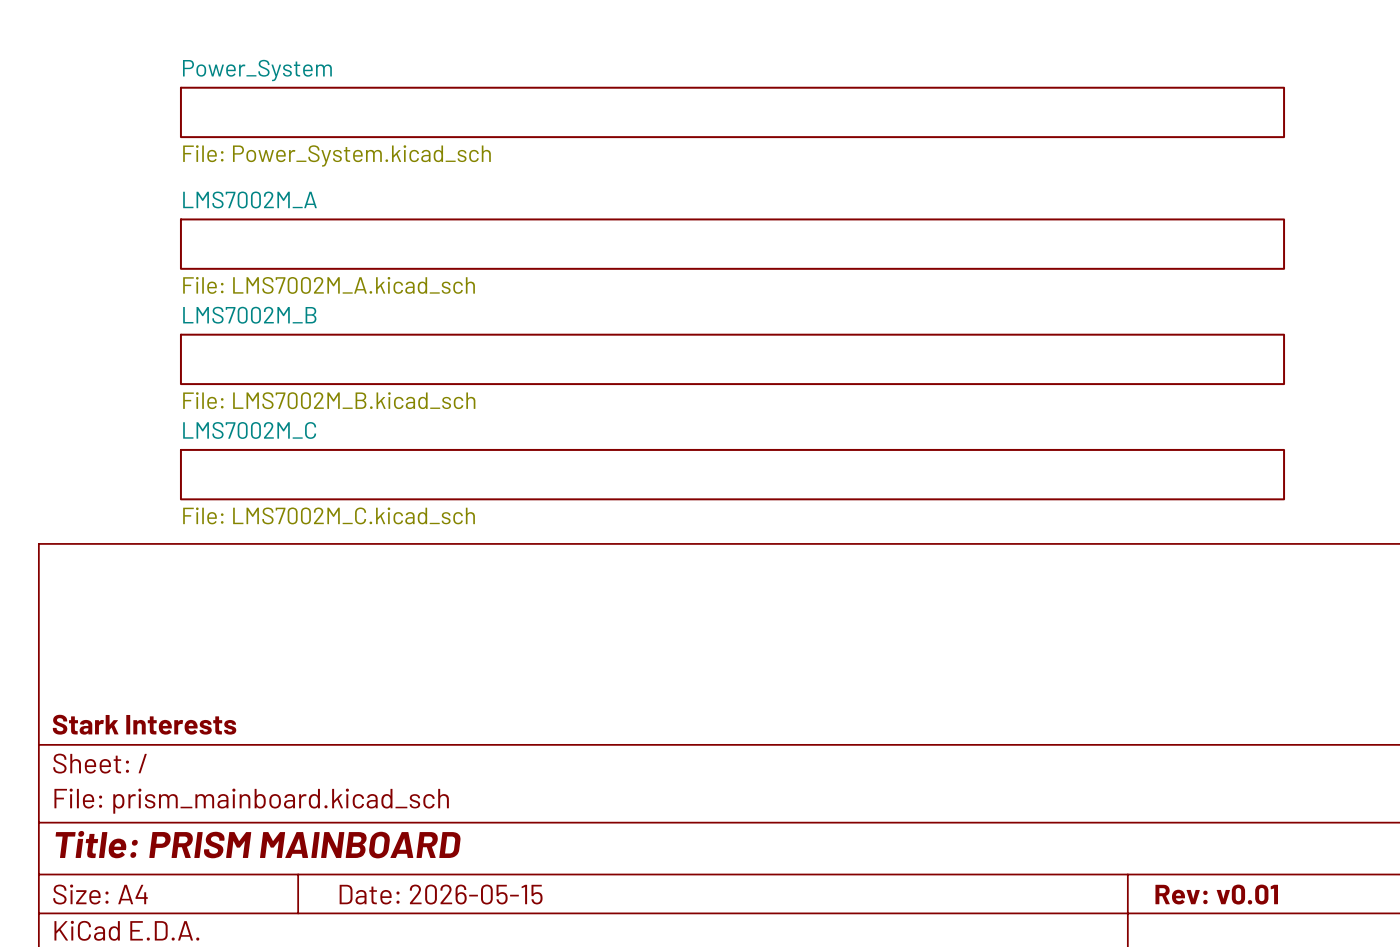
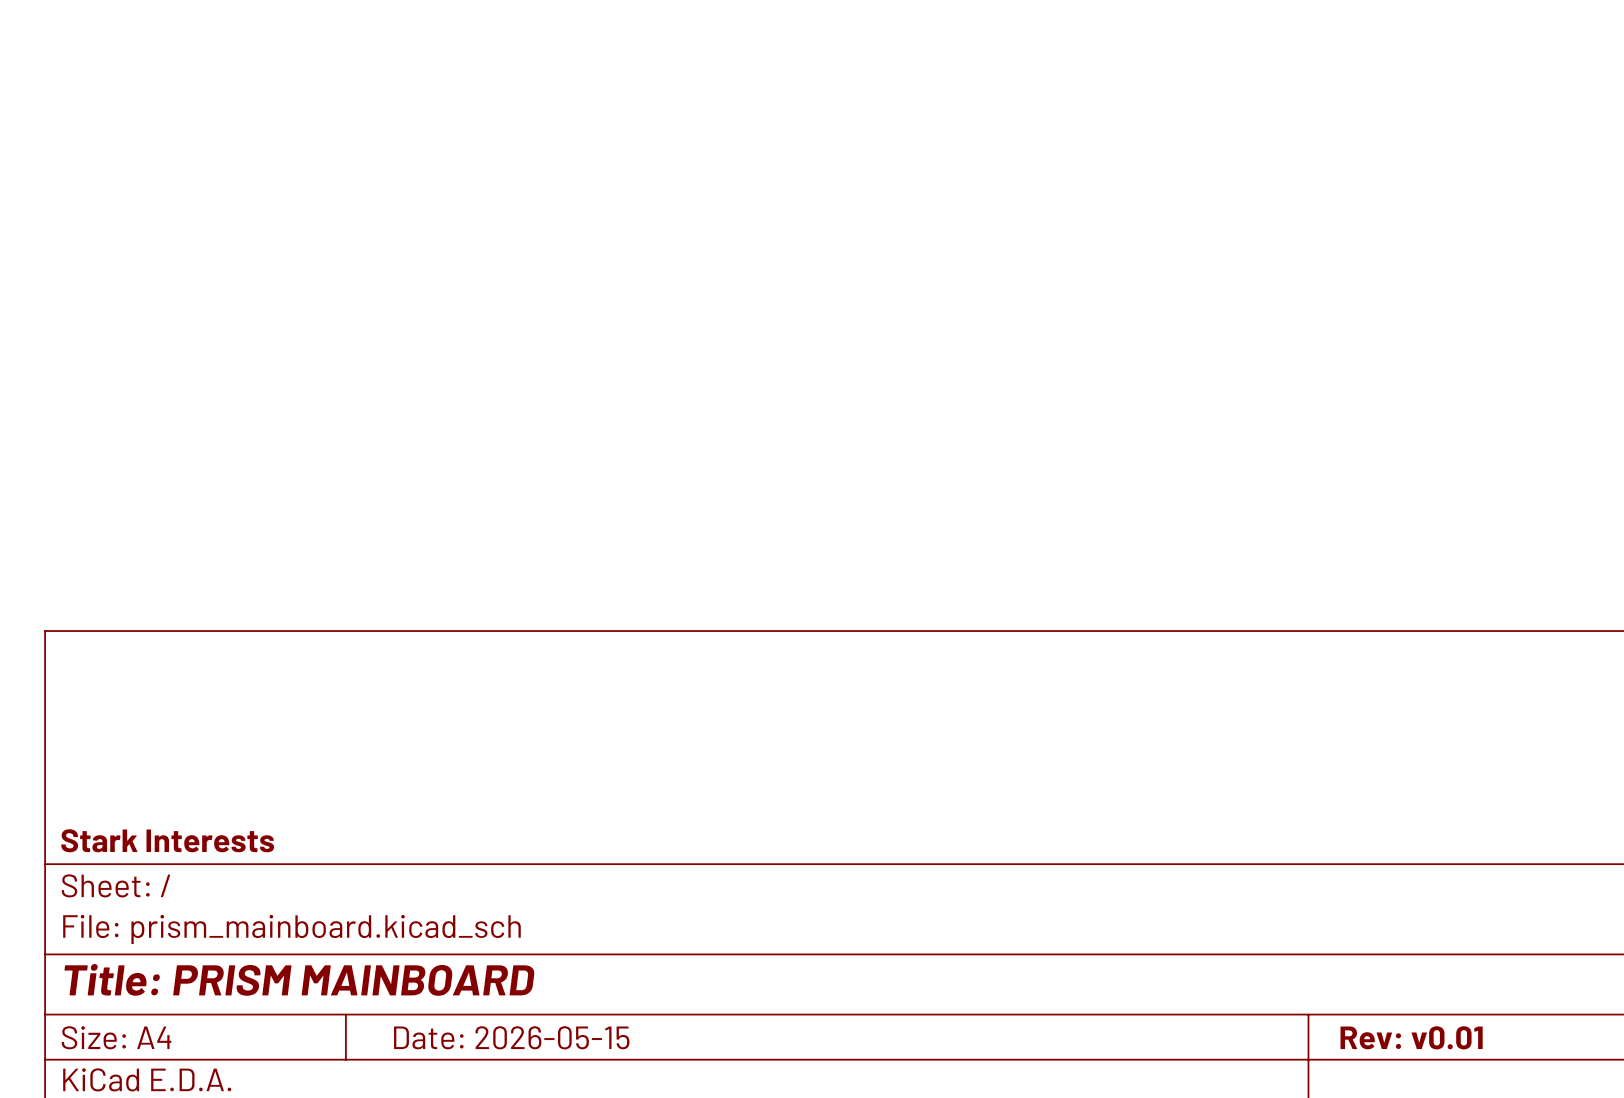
sheet Power_System: File: Power_System.kicad_sch (732, 112) -> none
sheet LMS7002M_A: File: LMS7002M_A.kicad_sch (732, 244) -> none
sheet LMS7002M_B: File: LMS7002M_B.kicad_sch (732, 359) -> none
sheet LMS7002M_C: File: LMS7002M_C.kicad_sch (732, 474) -> none

